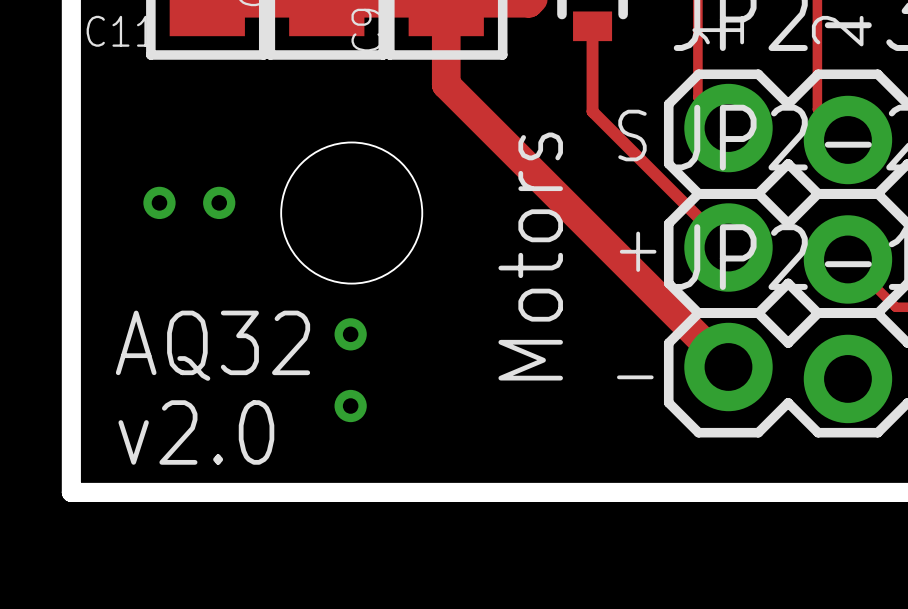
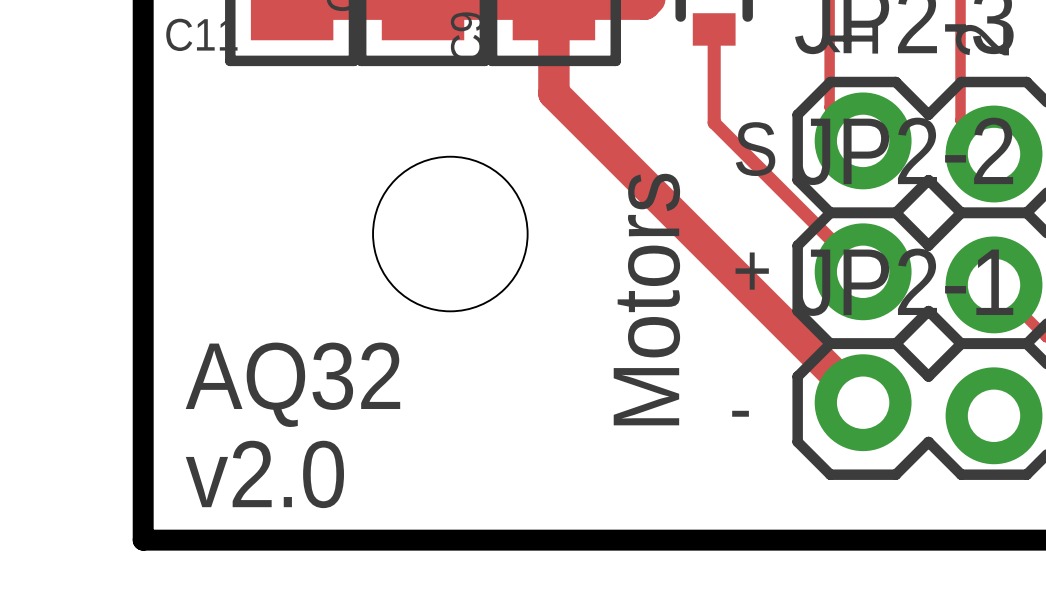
via: (159, 202) -> none
via: (219, 202) -> none
via: (350, 334) -> none
via: (350, 406) -> none

